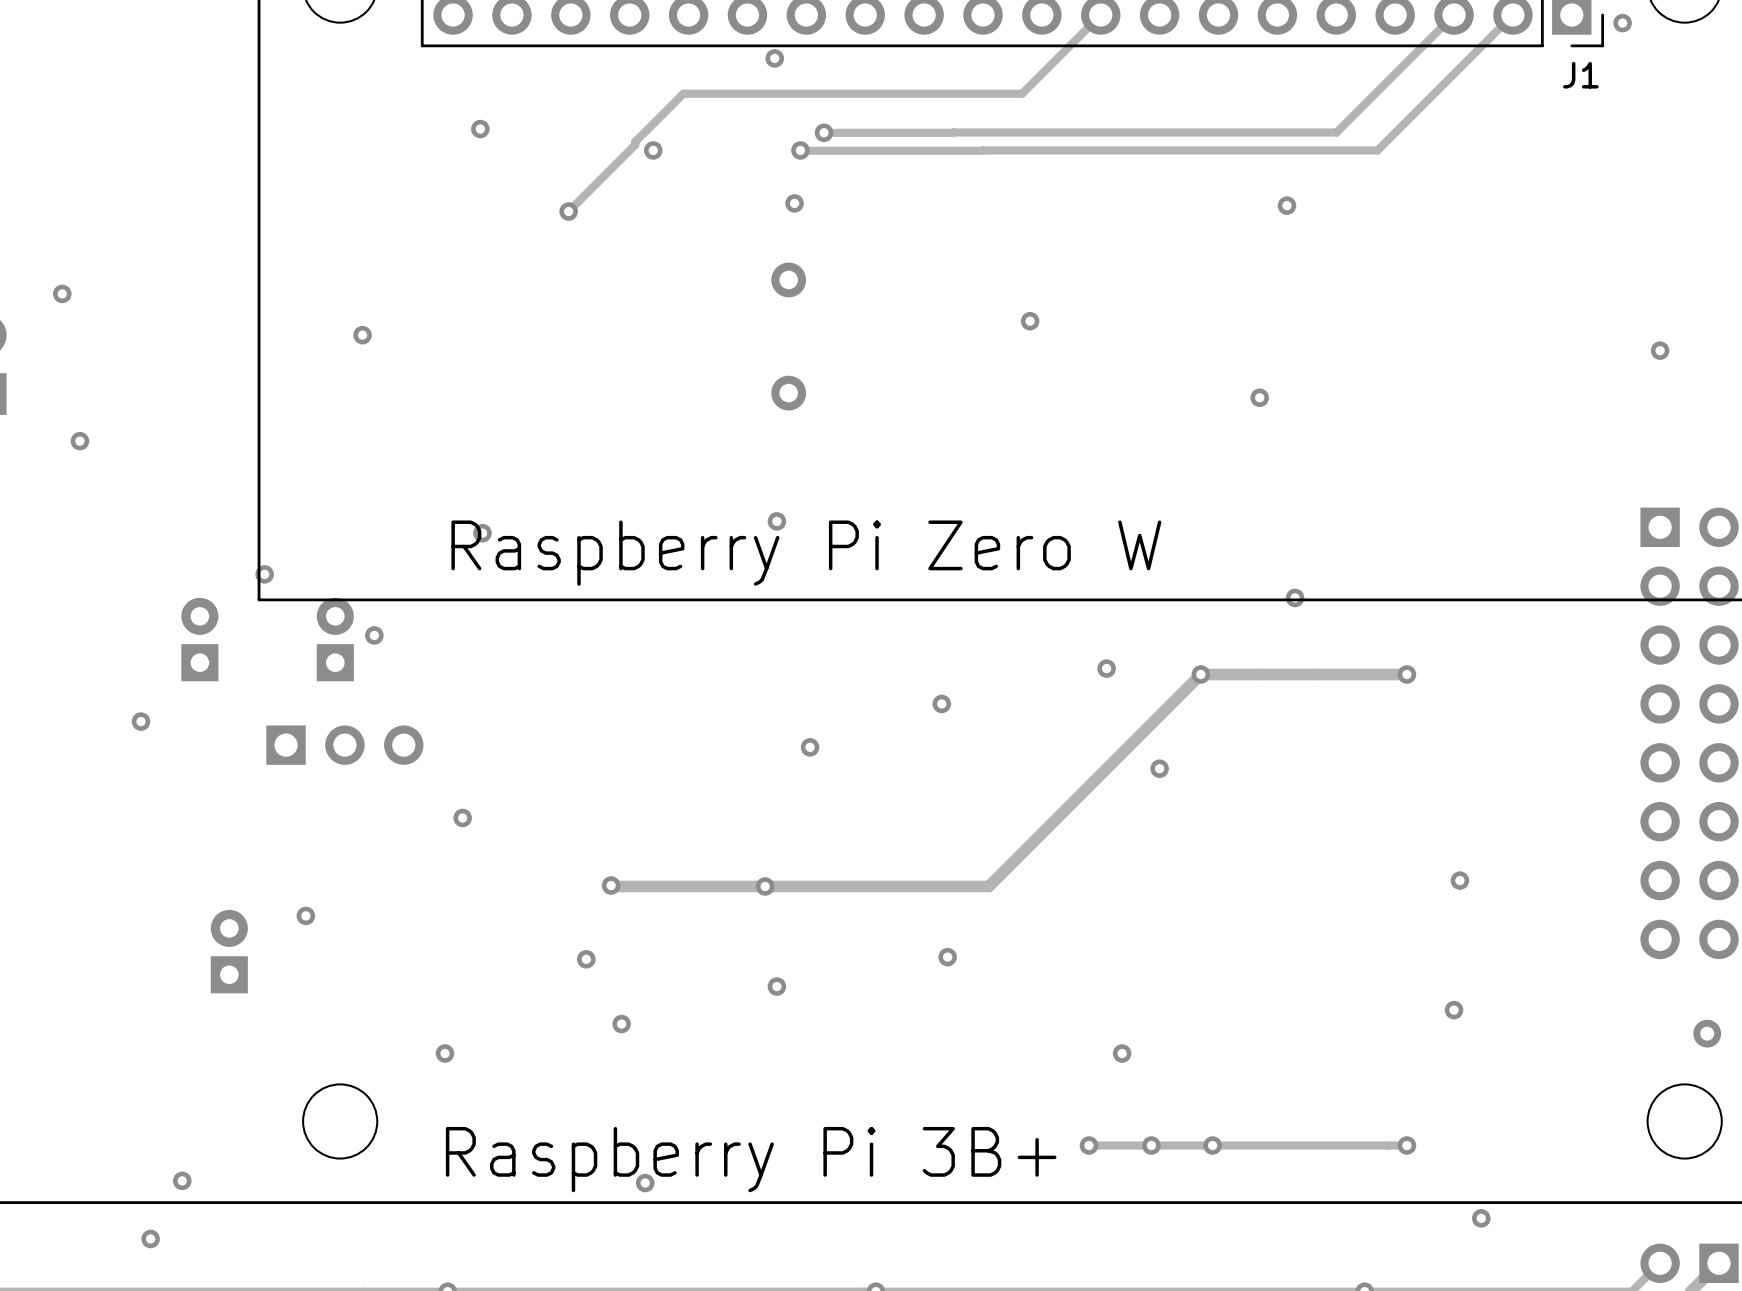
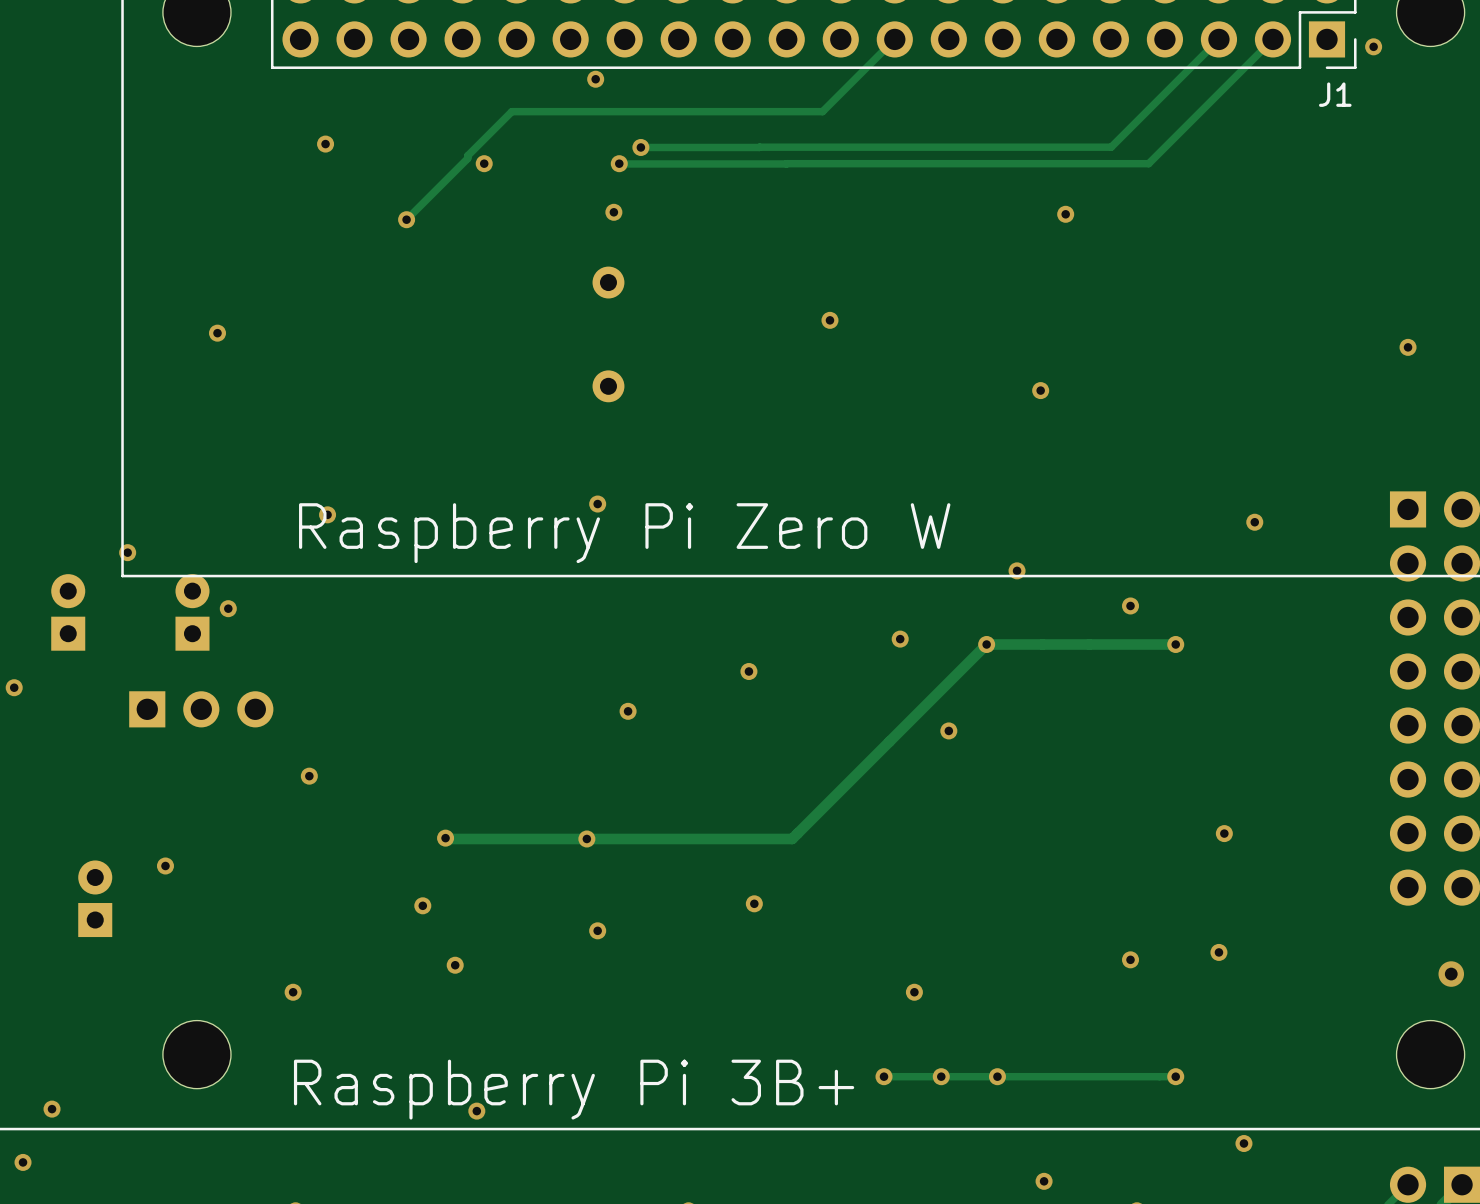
via: none -> (1254, 522)
via: none -> (1017, 570)
via: (1295, 597) -> none
via: none -> (1130, 605)
via: none -> (1130, 959)
via: none -> (1044, 1181)

